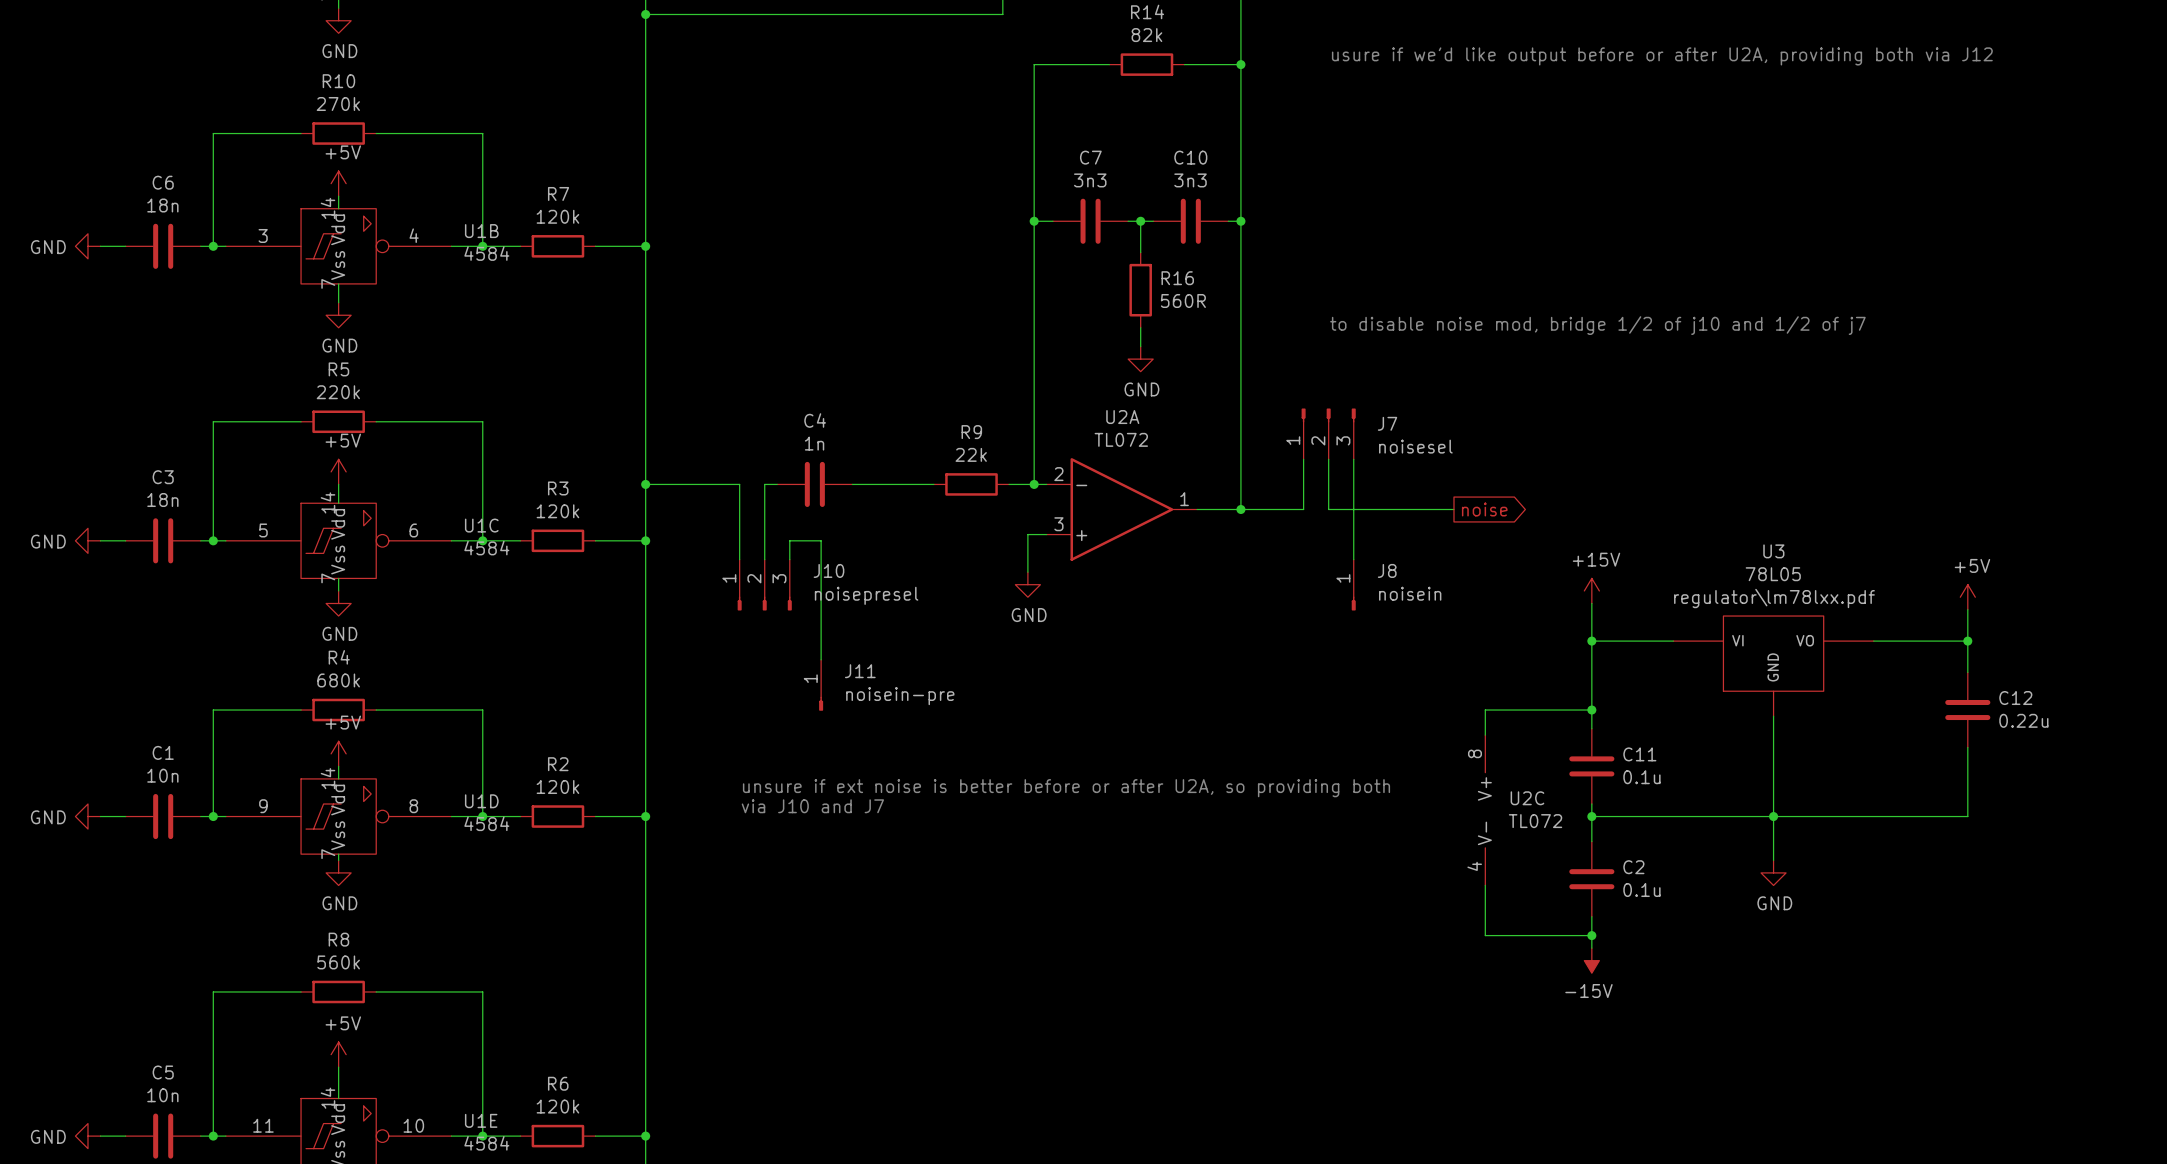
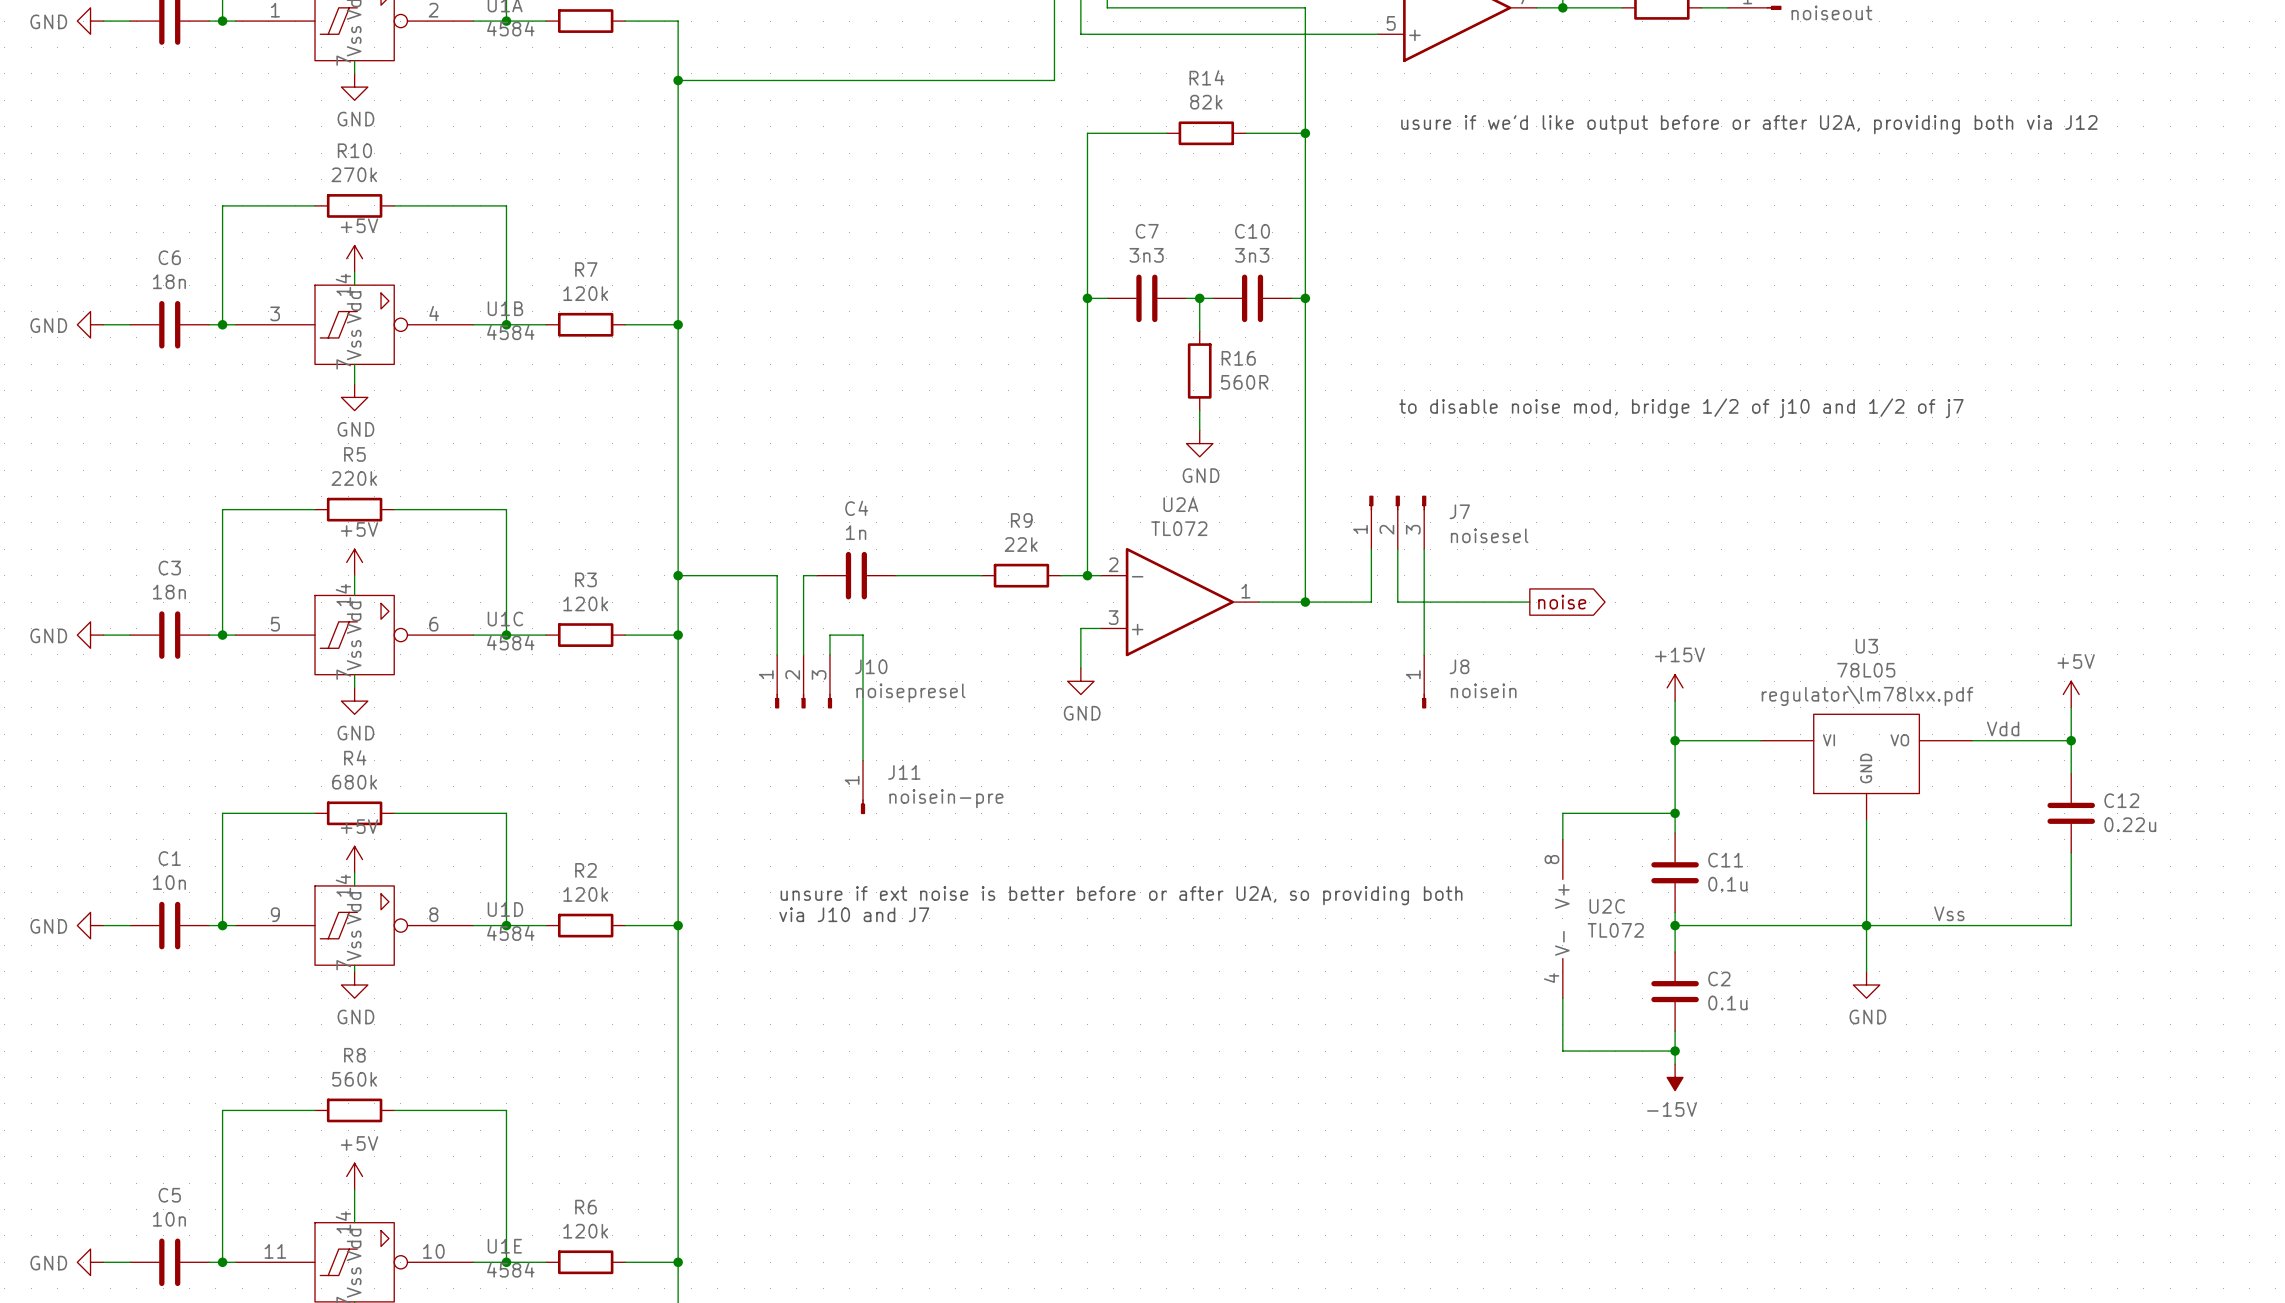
label: none -> Vdd (2003, 728)
label: none -> Vss (1949, 913)

